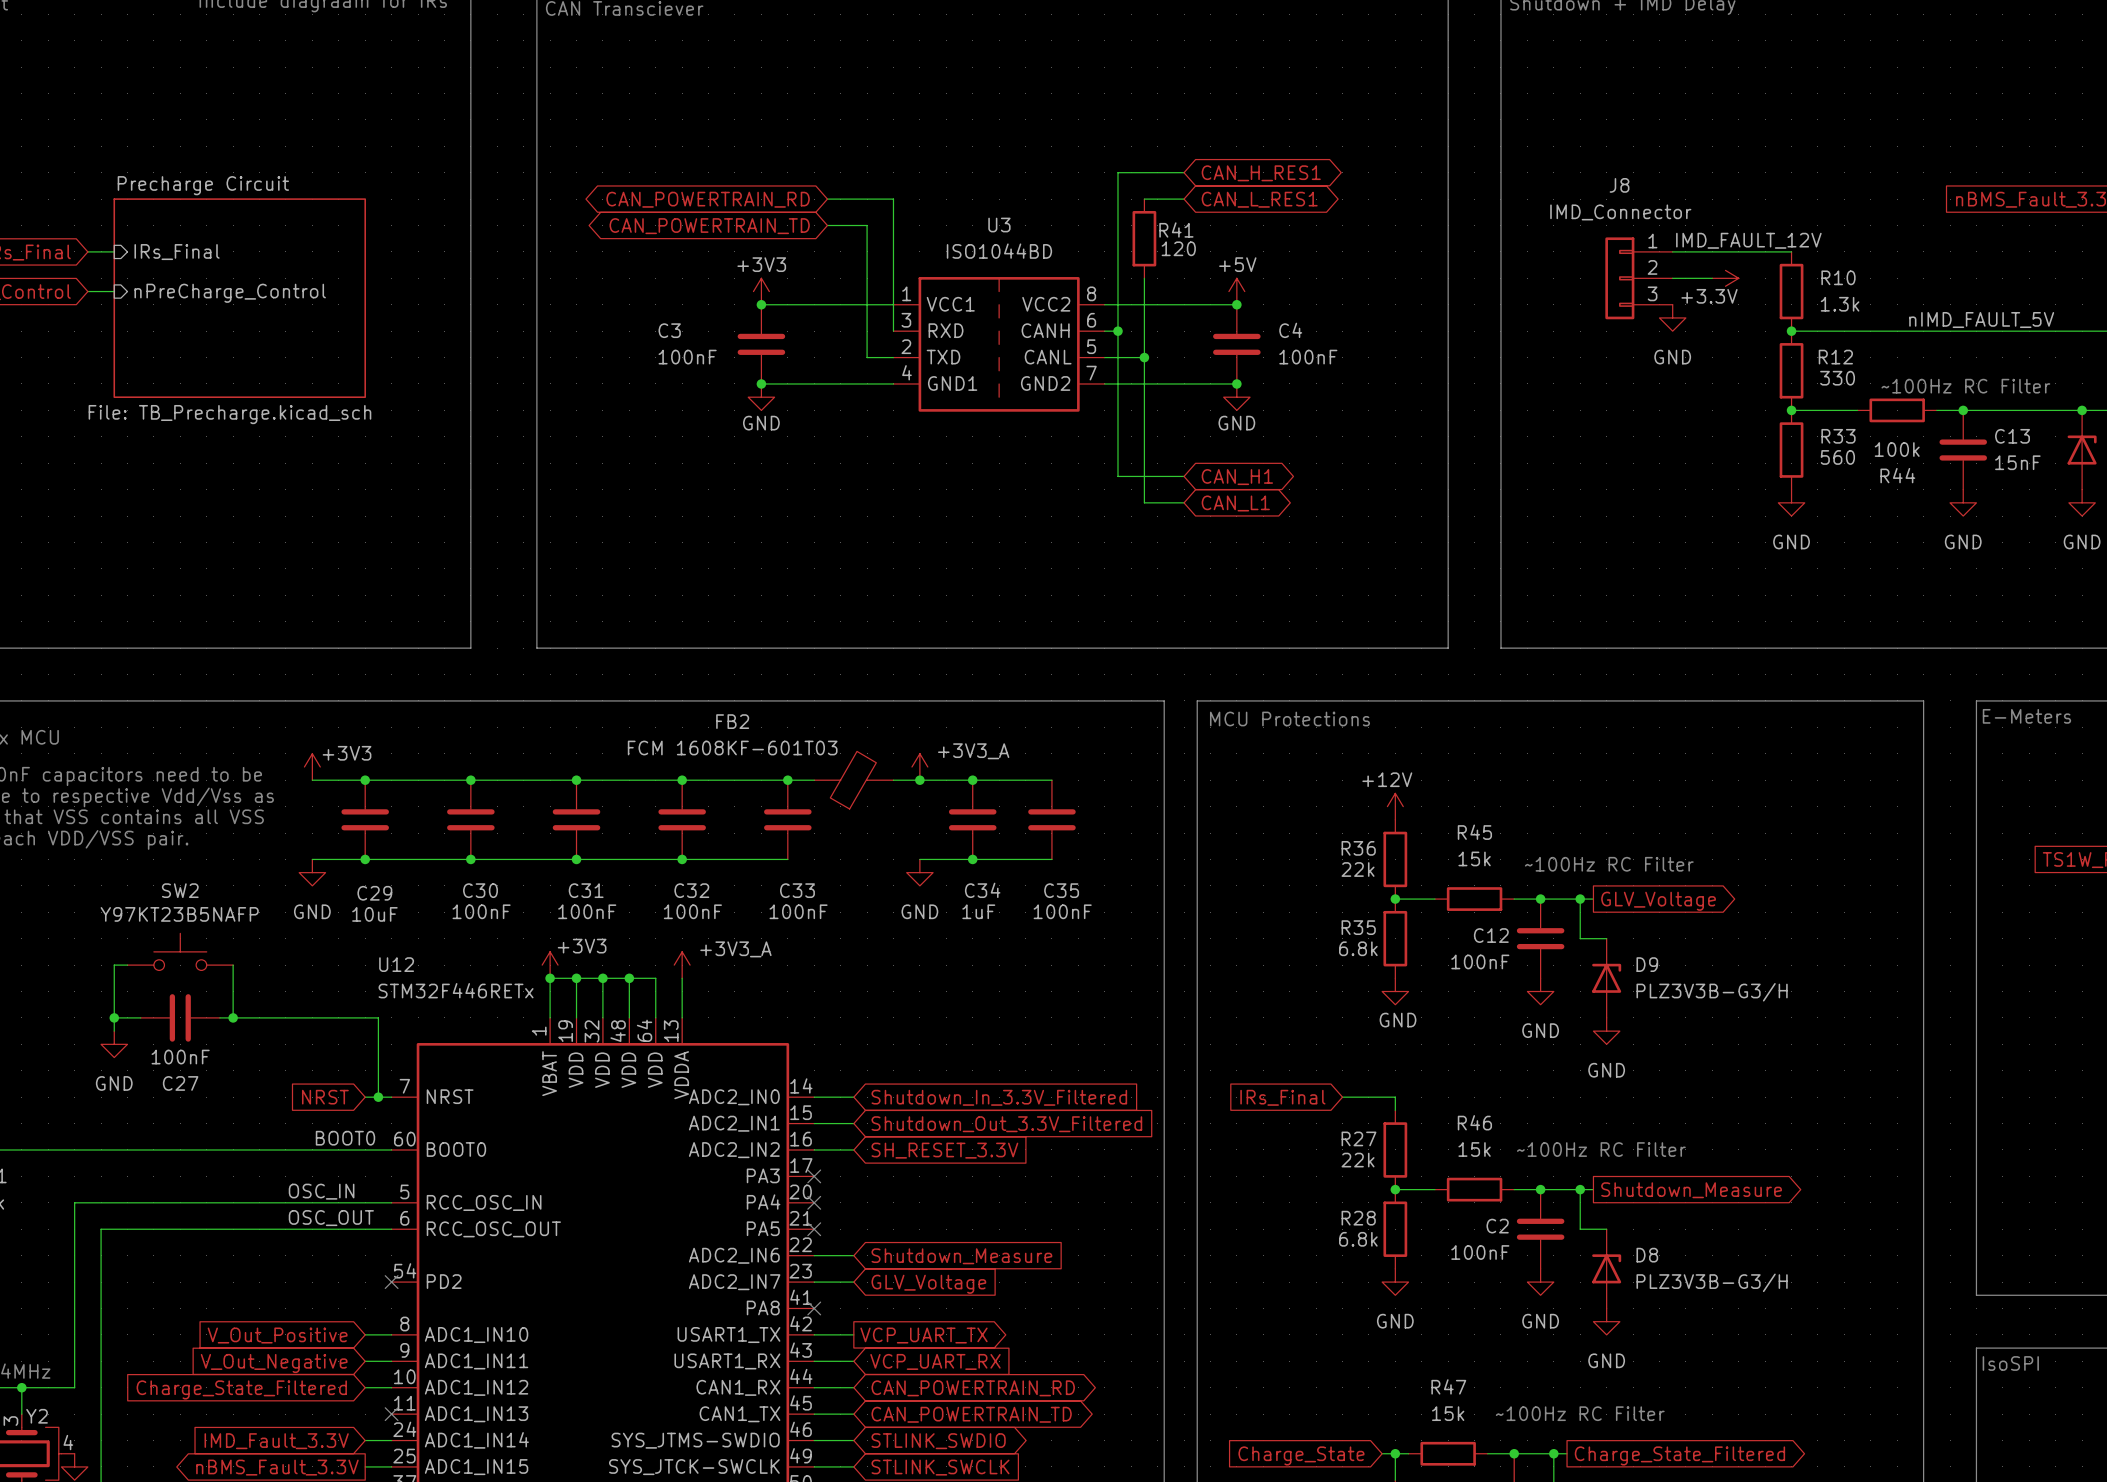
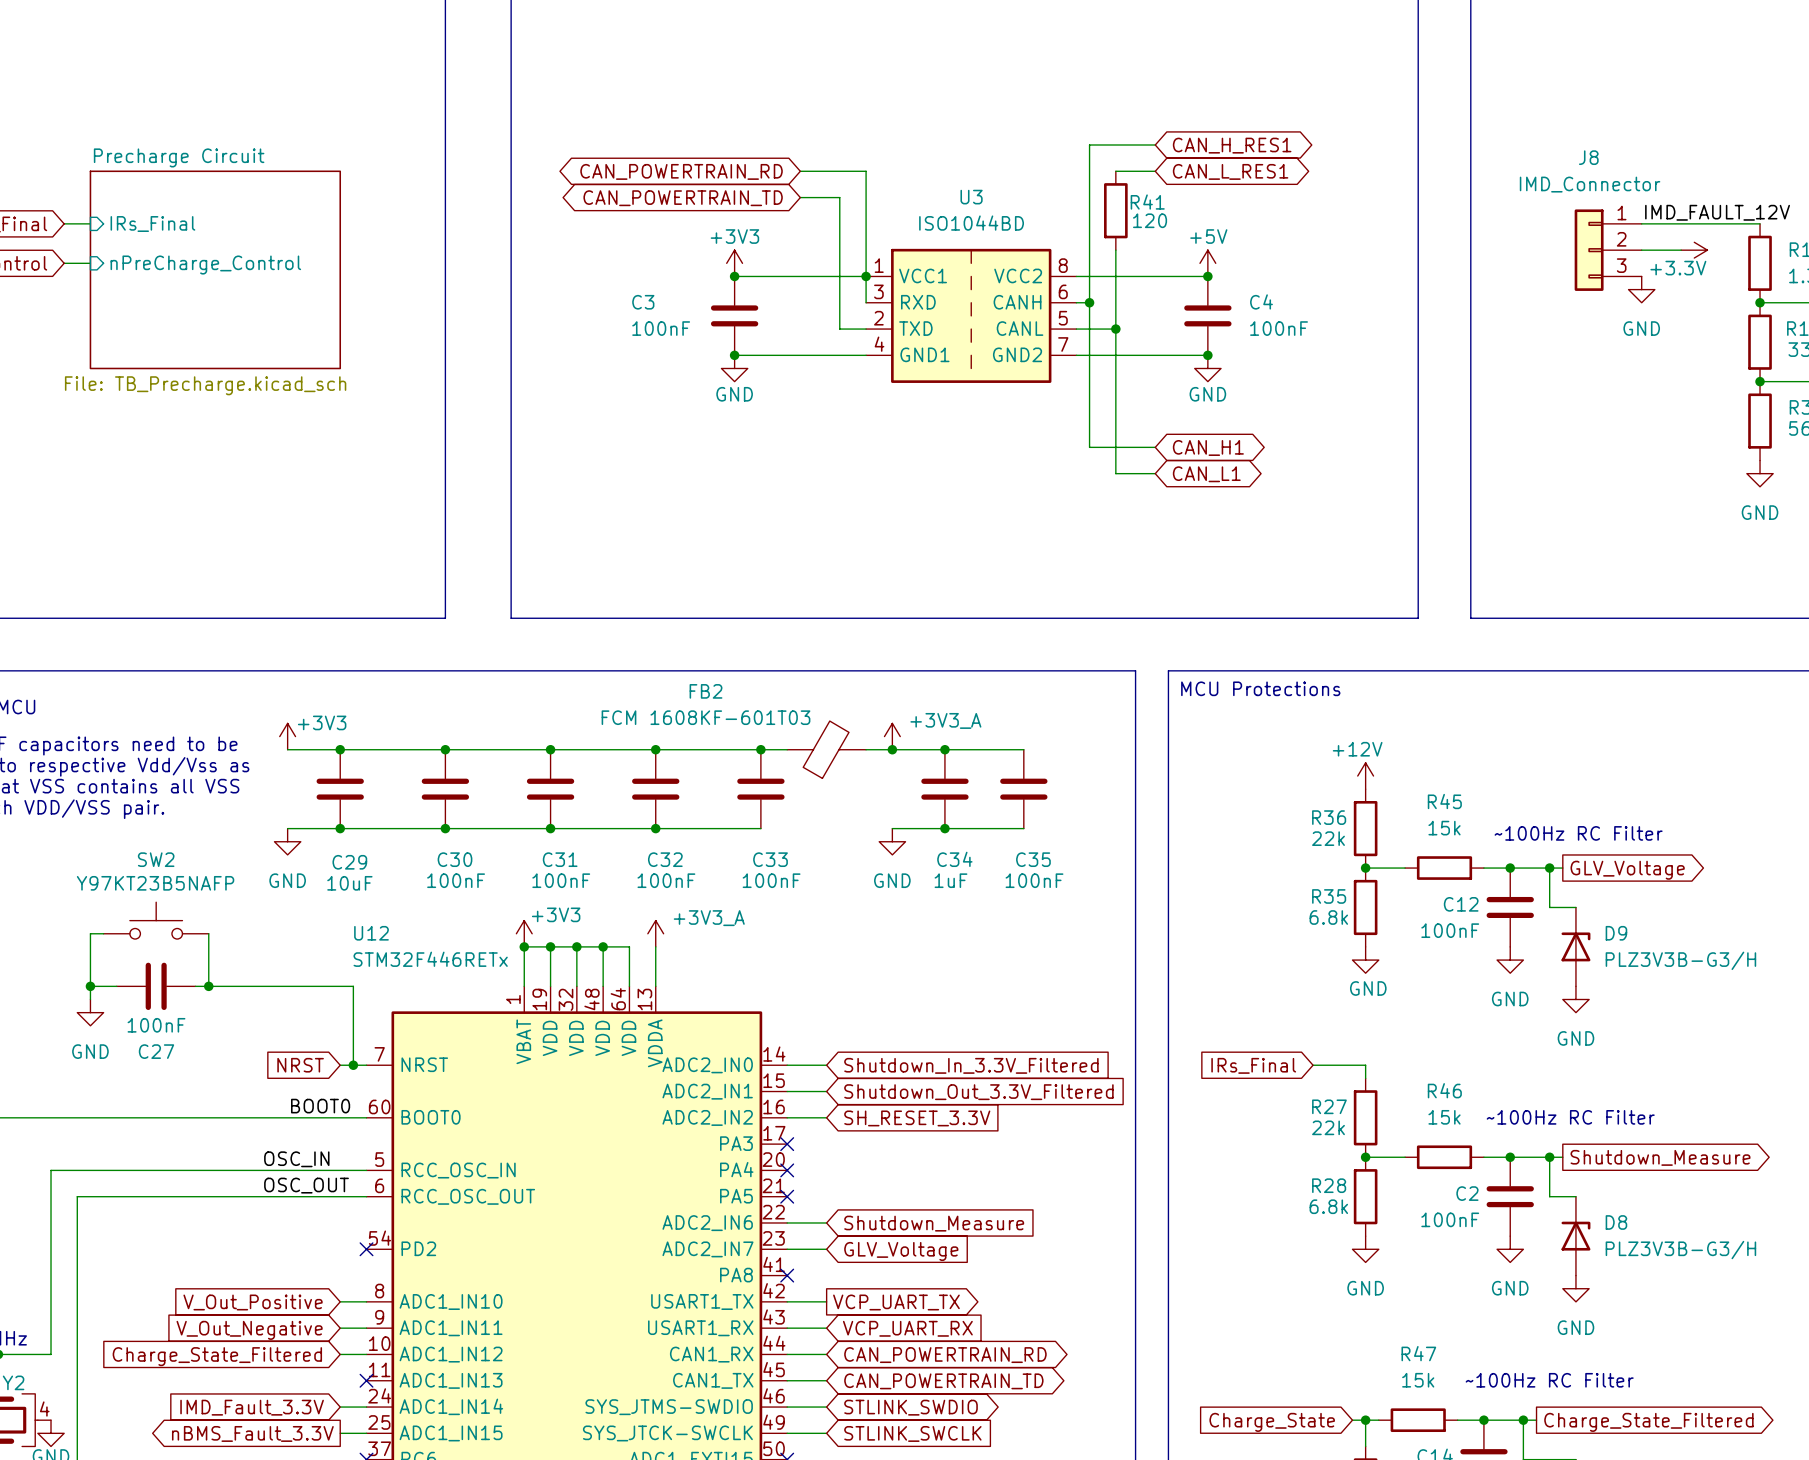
junction: none -> (866, 276)

